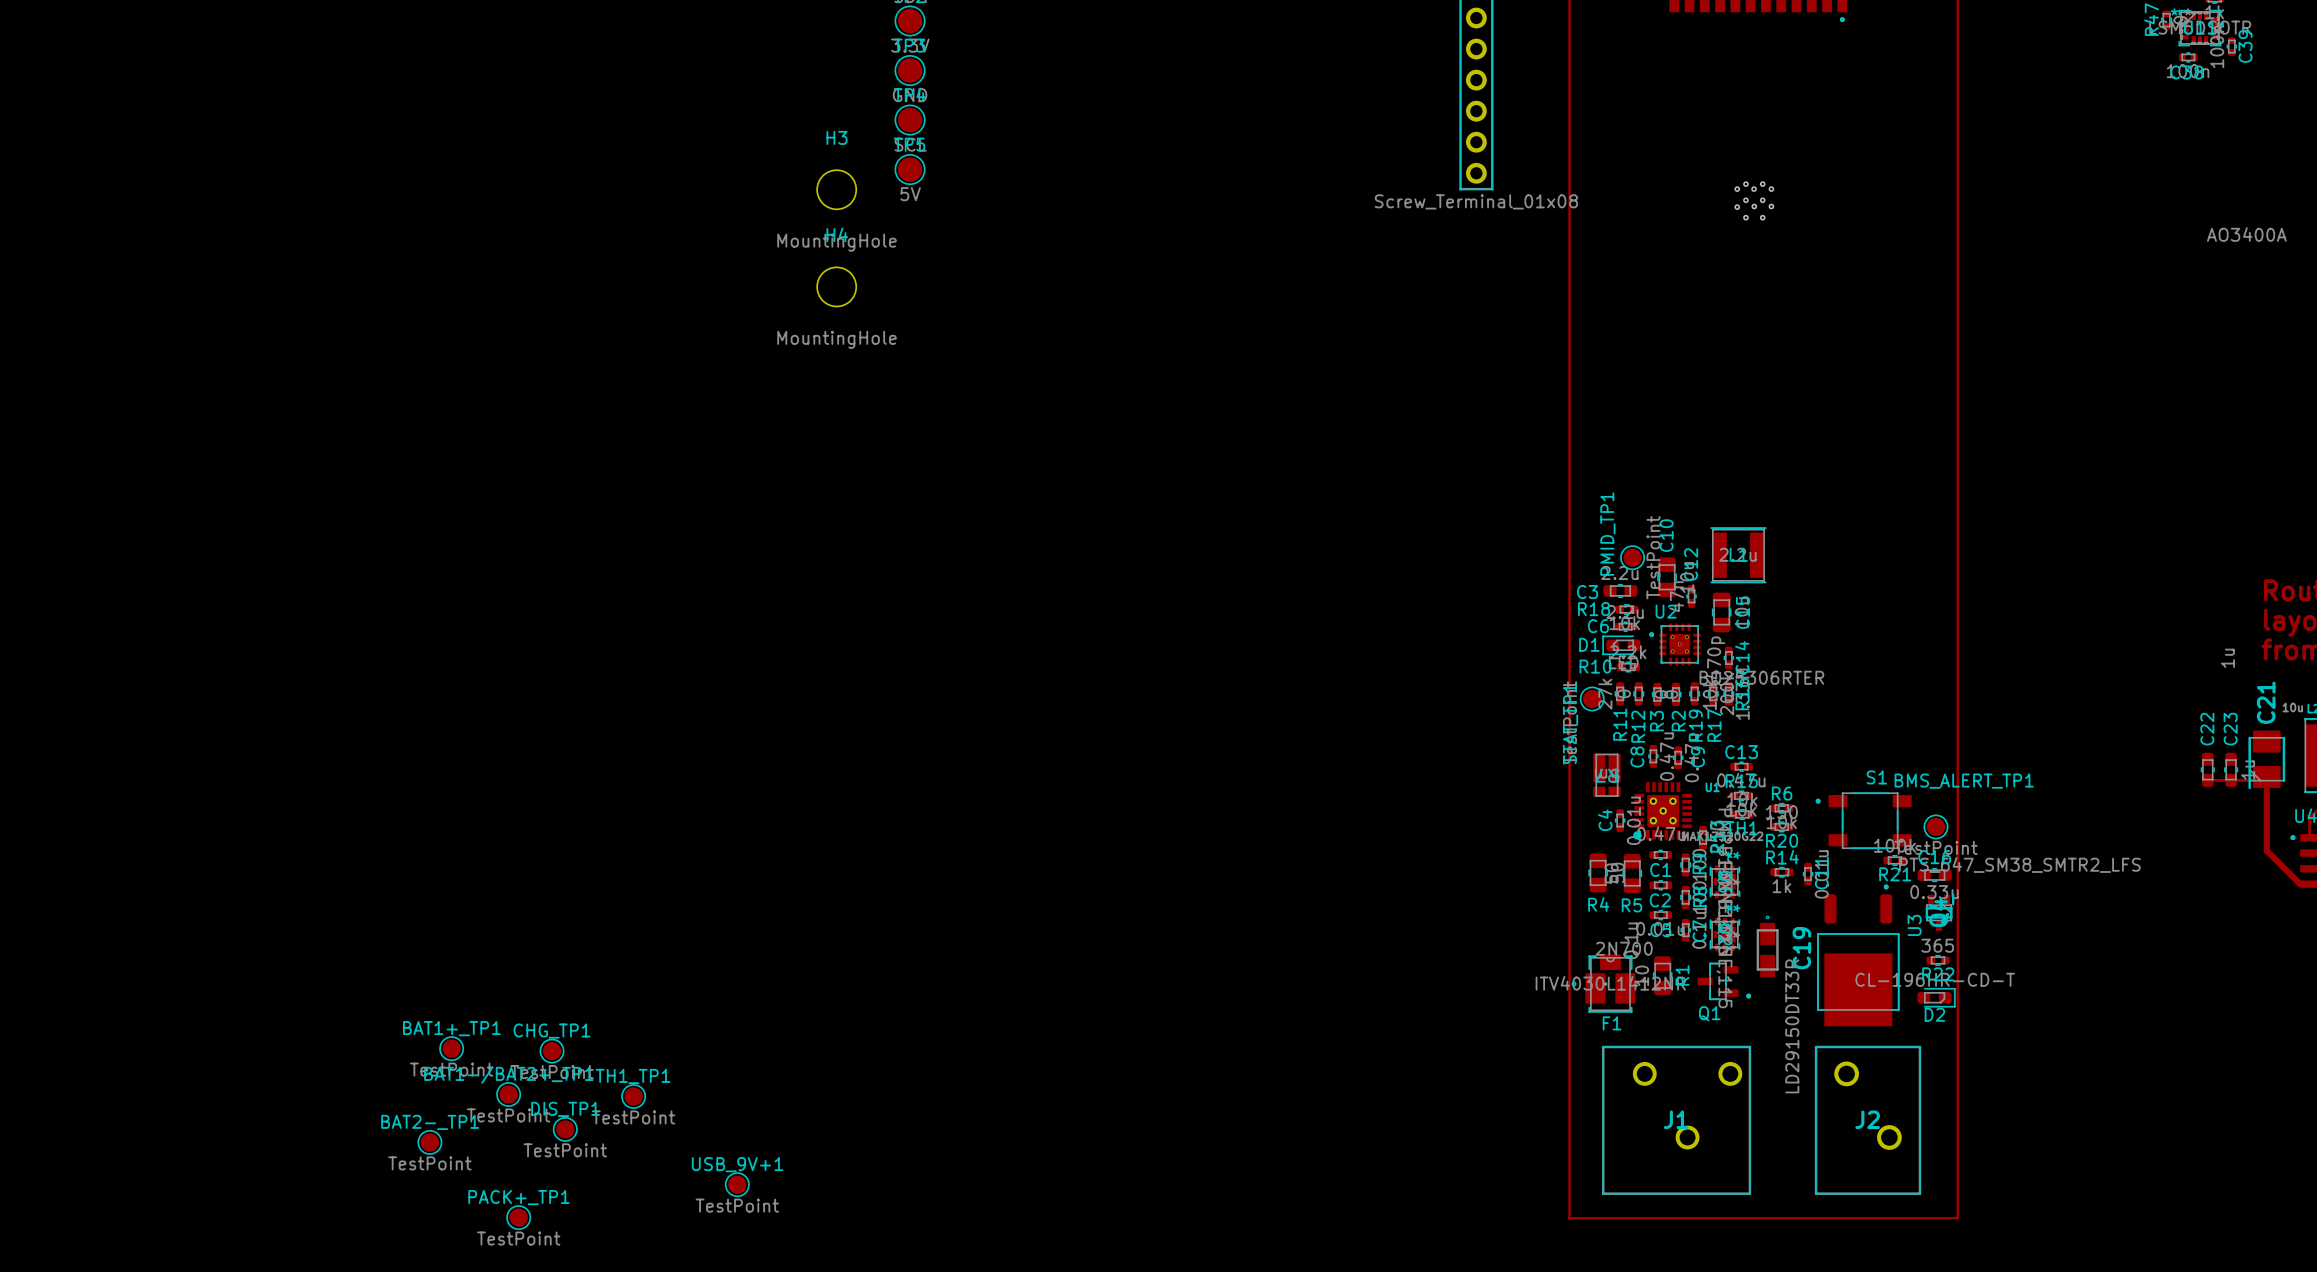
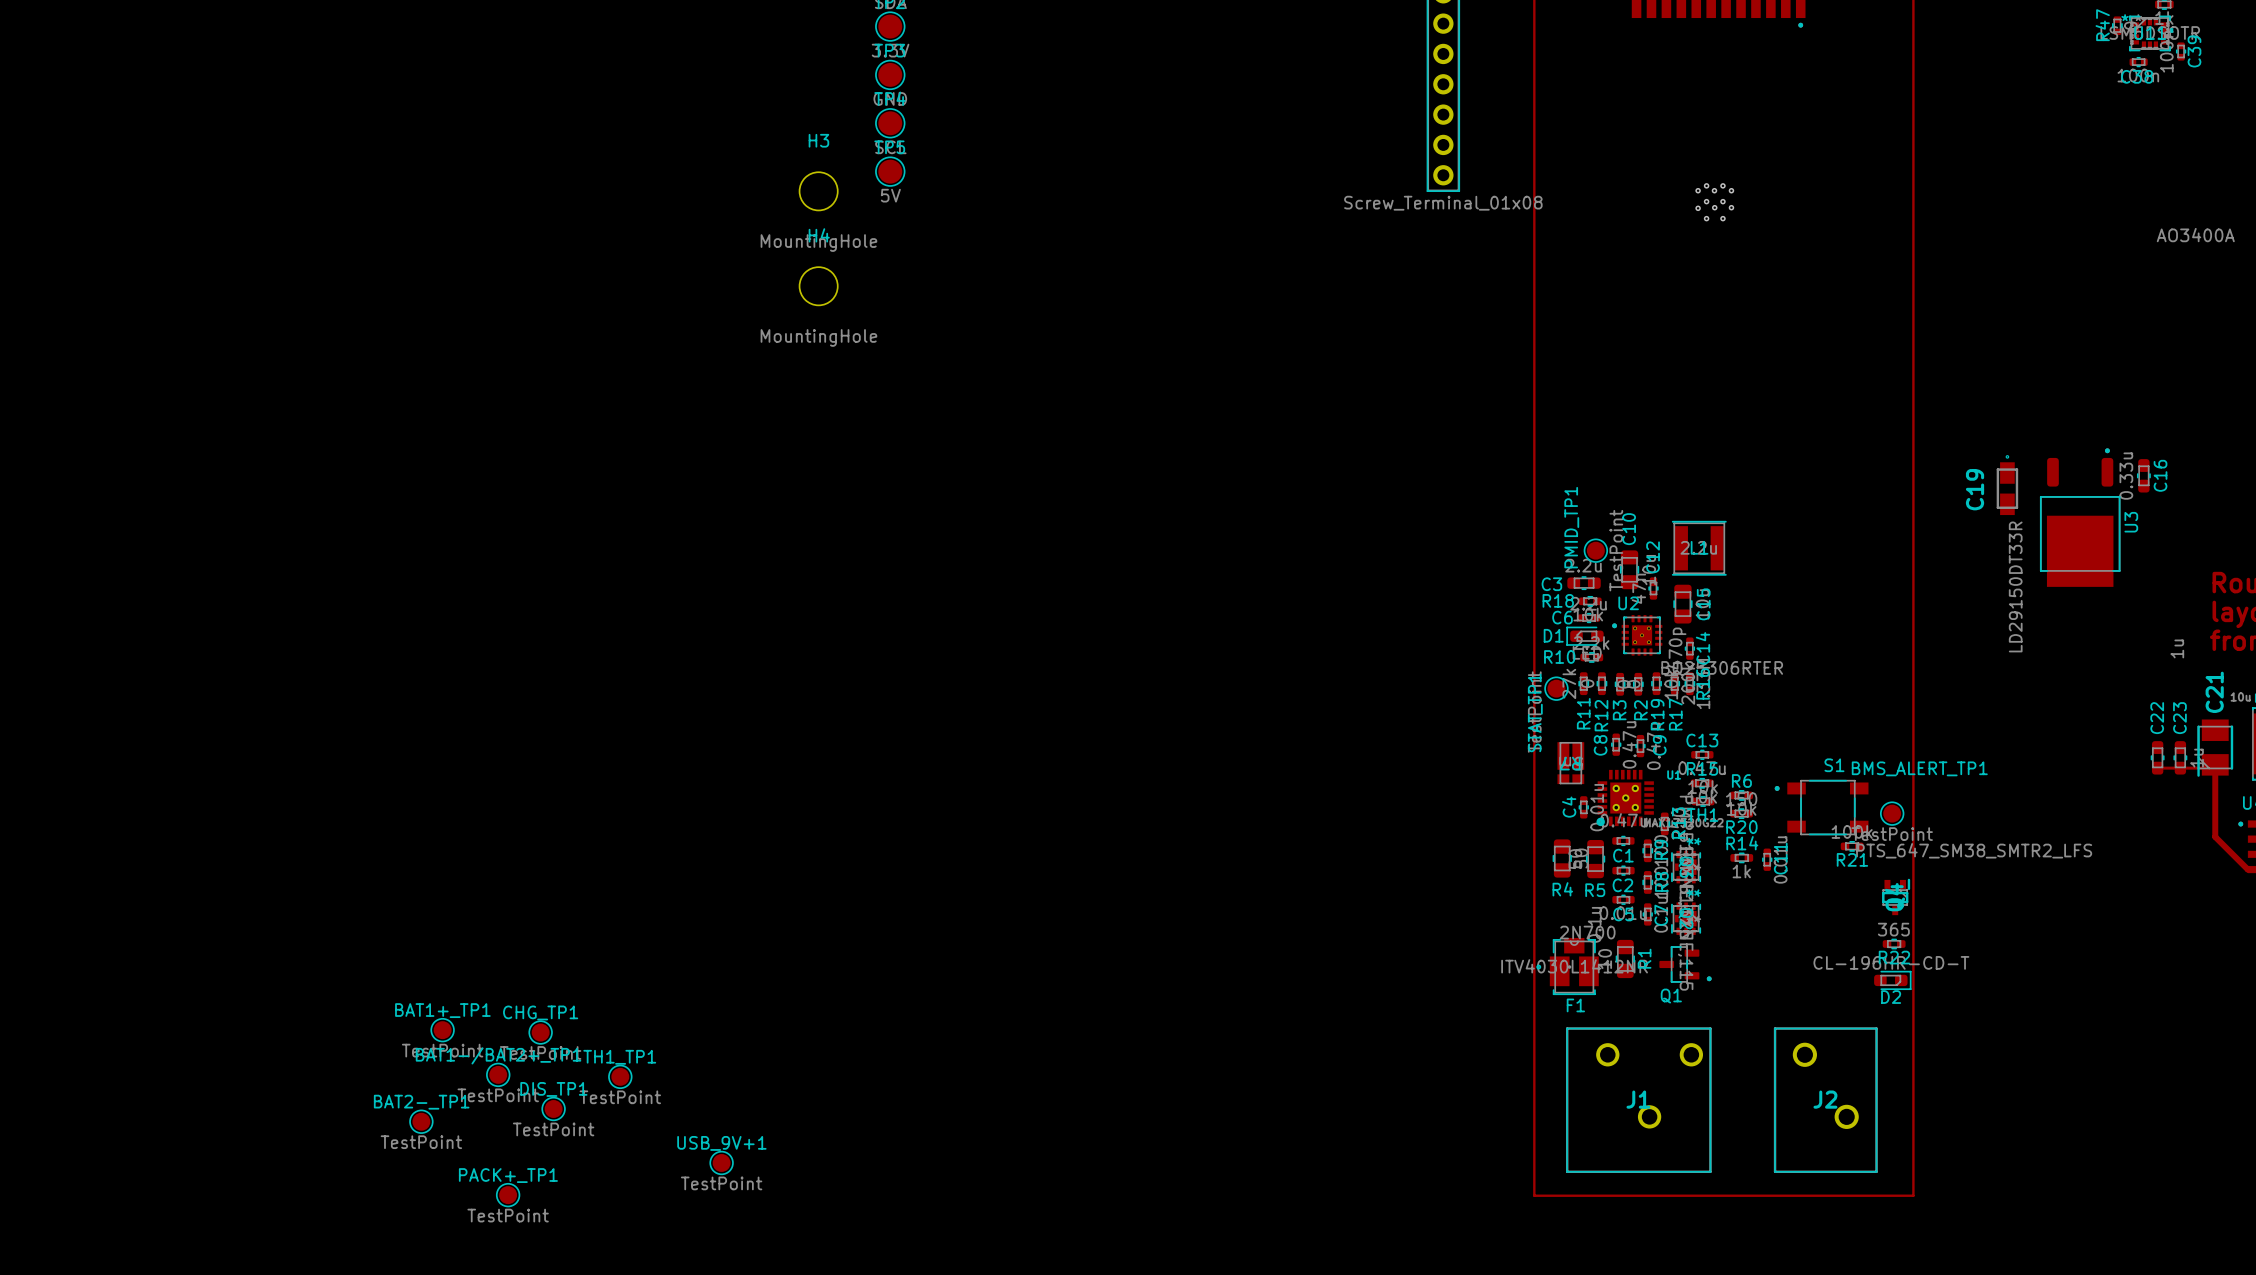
C16 rotation: 0° (1934, 875) -> 90° clockwise (2143, 475)
C16 position: (1934, 875) -> (2143, 475)
U3 name position: U3 (1914, 925) -> U3 (2131, 522)
C19 position: (1767, 946) -> (2007, 485)
C19 name position: C19 (1801, 948) -> C19 (1975, 489)
U3 position: (1858, 955) -> (2080, 517)

